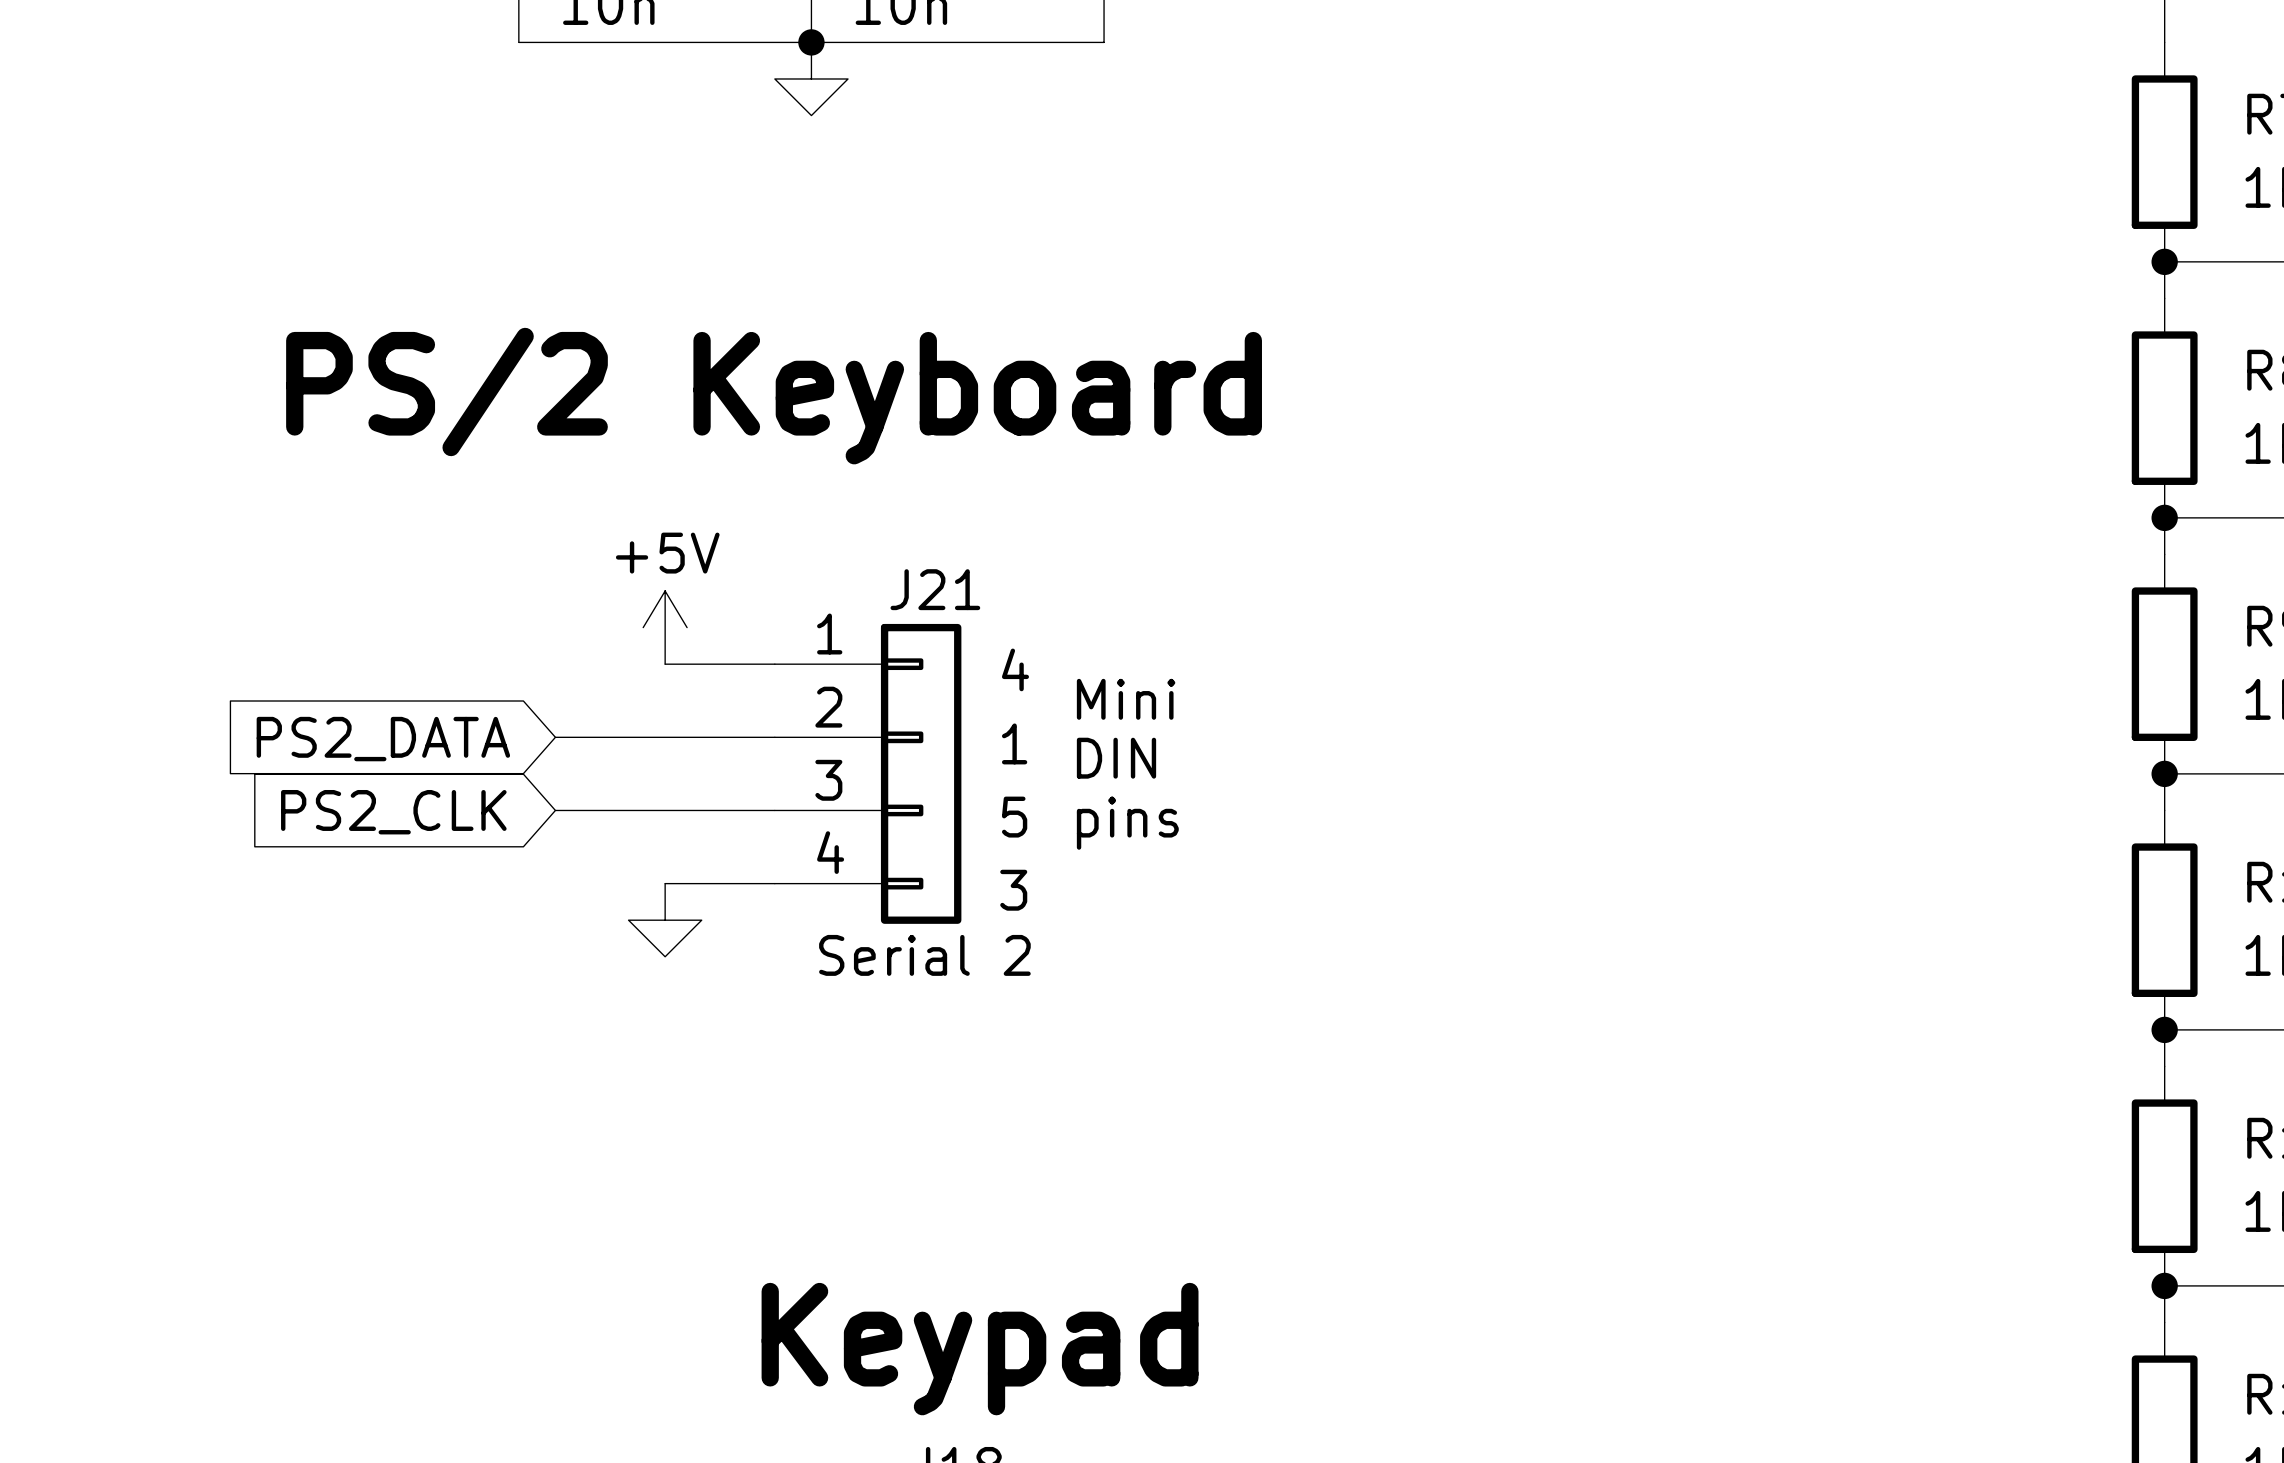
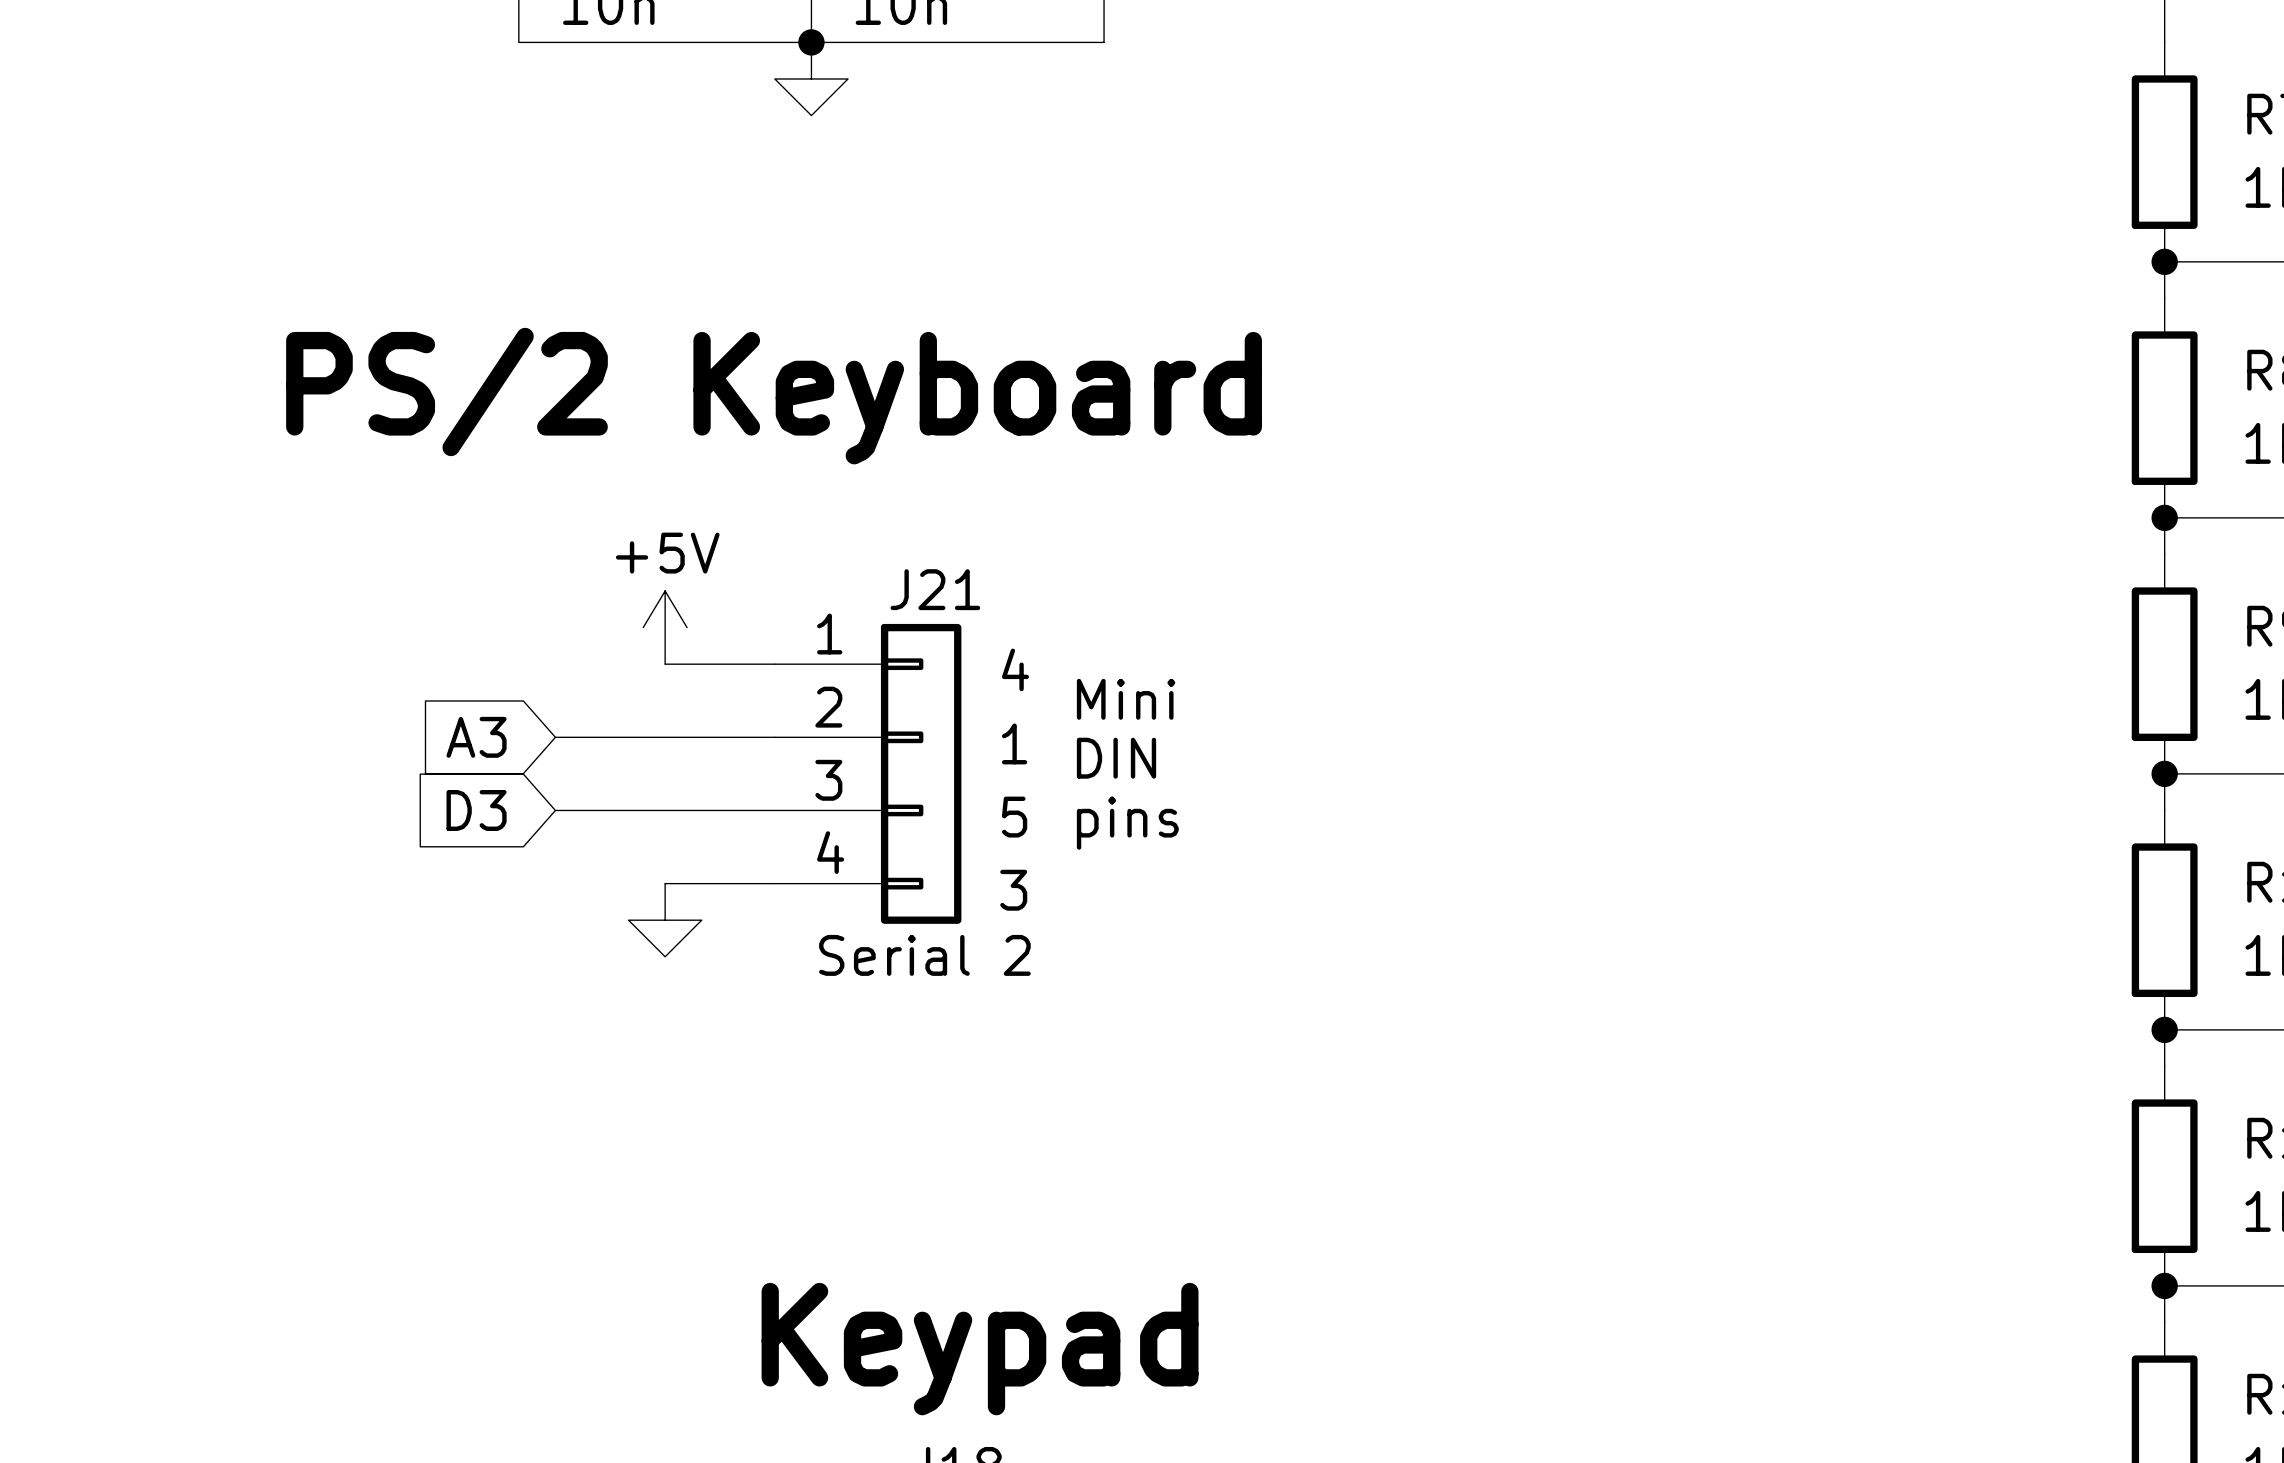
global label: PS2_DATA (383, 739) -> A3 (476, 737)
global label: PS2_CLK (393, 812) -> D3 (476, 810)

